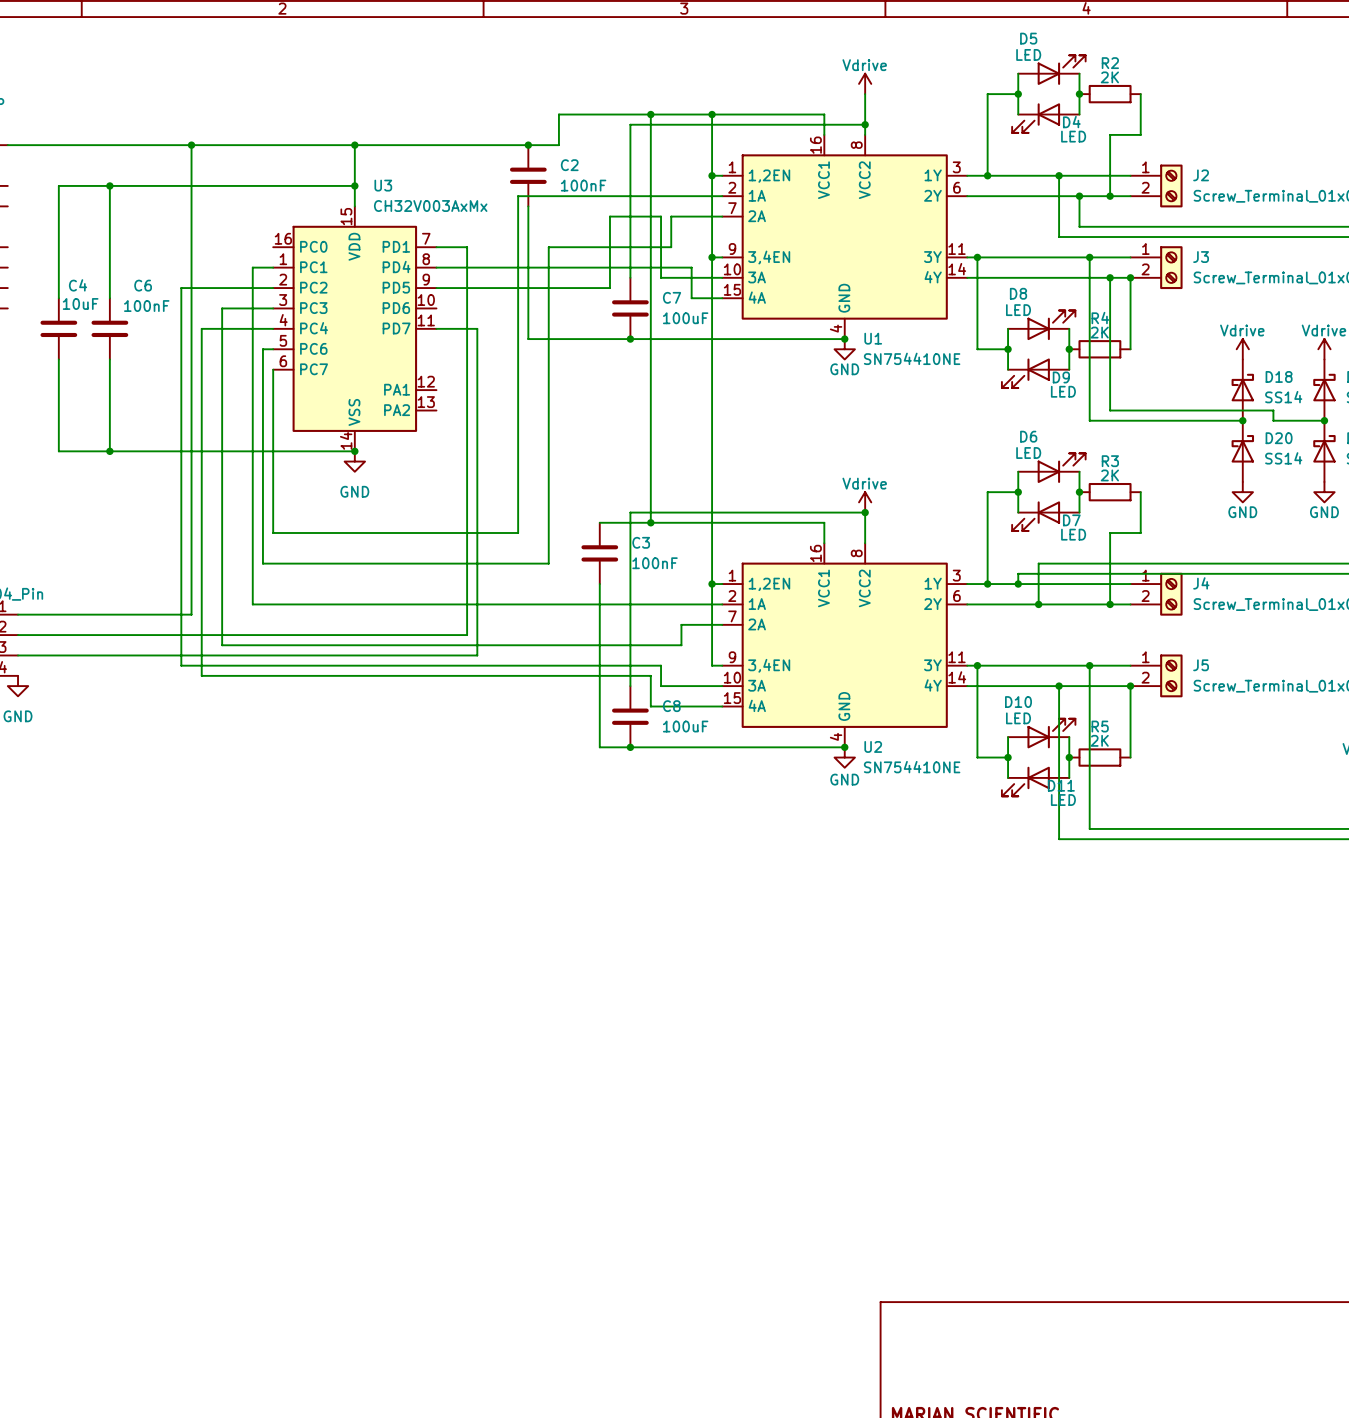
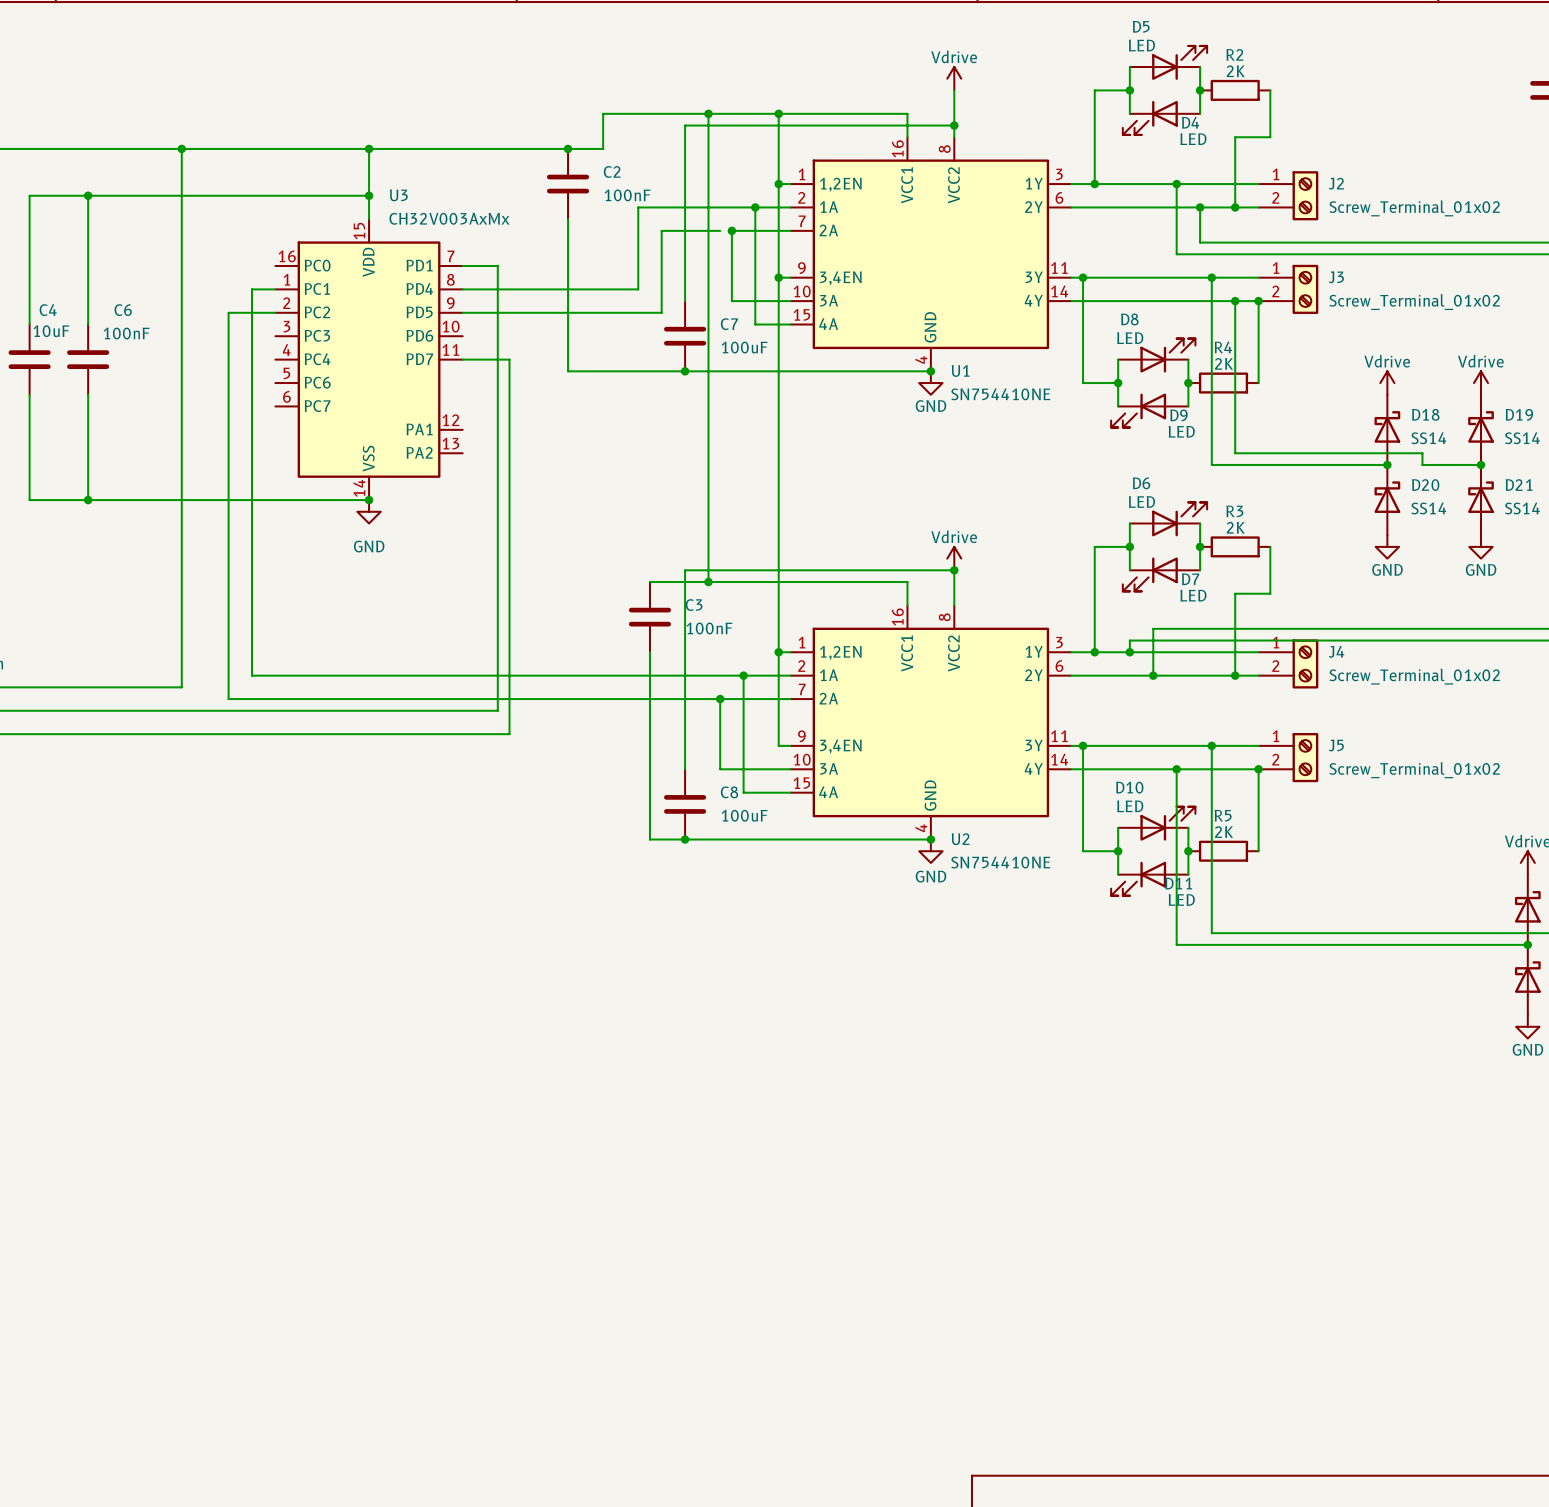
wire: (589, 196) (518, 196) (518, 532) (273, 532) (273, 369) -> none
wire: none -> (755, 207) (755, 289)
junction: none -> (755, 207)
wire: (661, 216) (661, 277) (671, 277) -> (731, 265) (731, 301)
junction: none -> (731, 230)
wire: (671, 247) (548, 247) (548, 563) (262, 563) (262, 349) (273, 349) -> none
wire: (589, 267) (691, 267) -> (638, 289) (638, 207)
wire: (232, 288) (181, 288) (181, 665) (661, 665) -> (228, 312) (228, 699) (743, 699) (743, 675)
wire: (273, 308) (222, 308) (222, 645) (681, 645) -> none
wire: (273, 328) (201, 328) (201, 675) (650, 675) (650, 706) (681, 706) -> (743, 722) (743, 792)
junction: none -> (743, 675)
wire: none -> (720, 699) (720, 745)
junction: none -> (720, 699)

